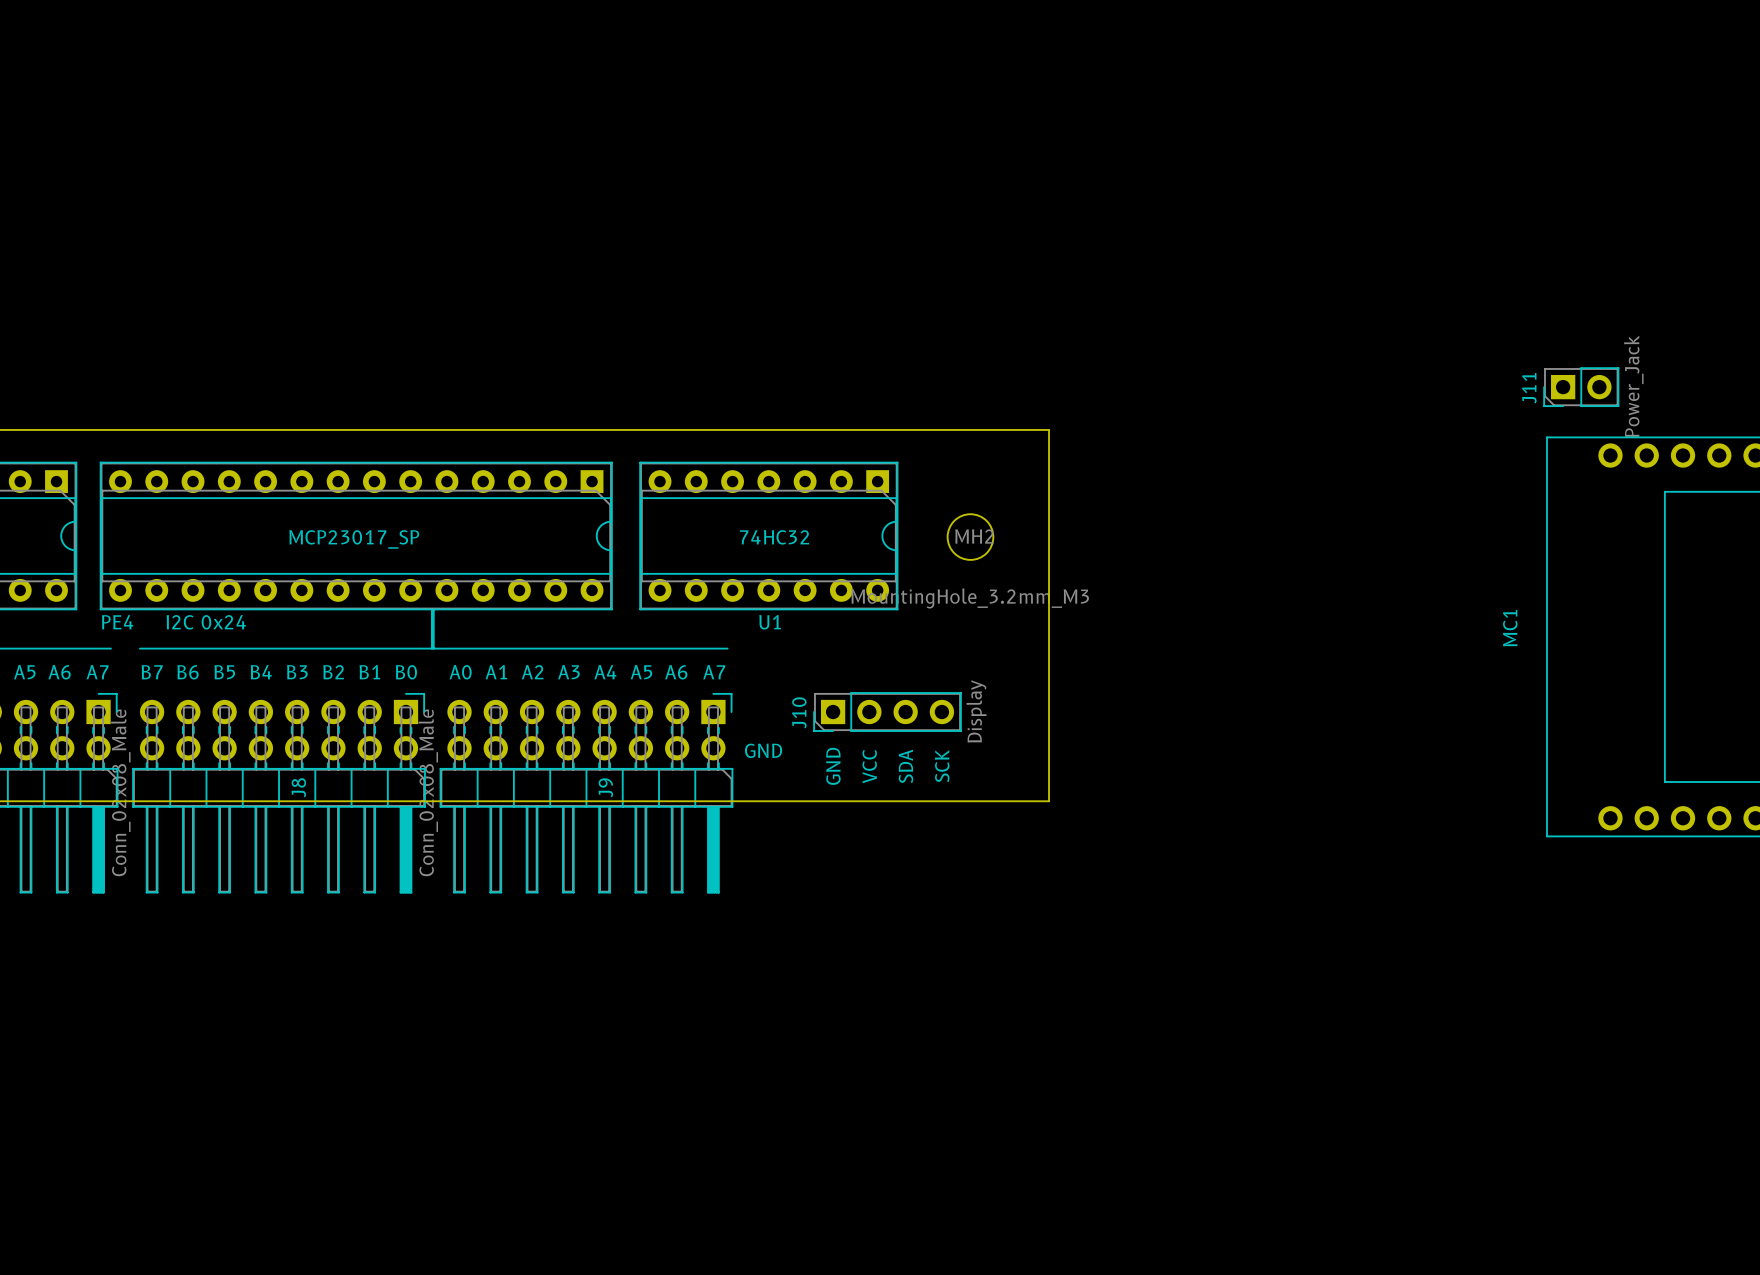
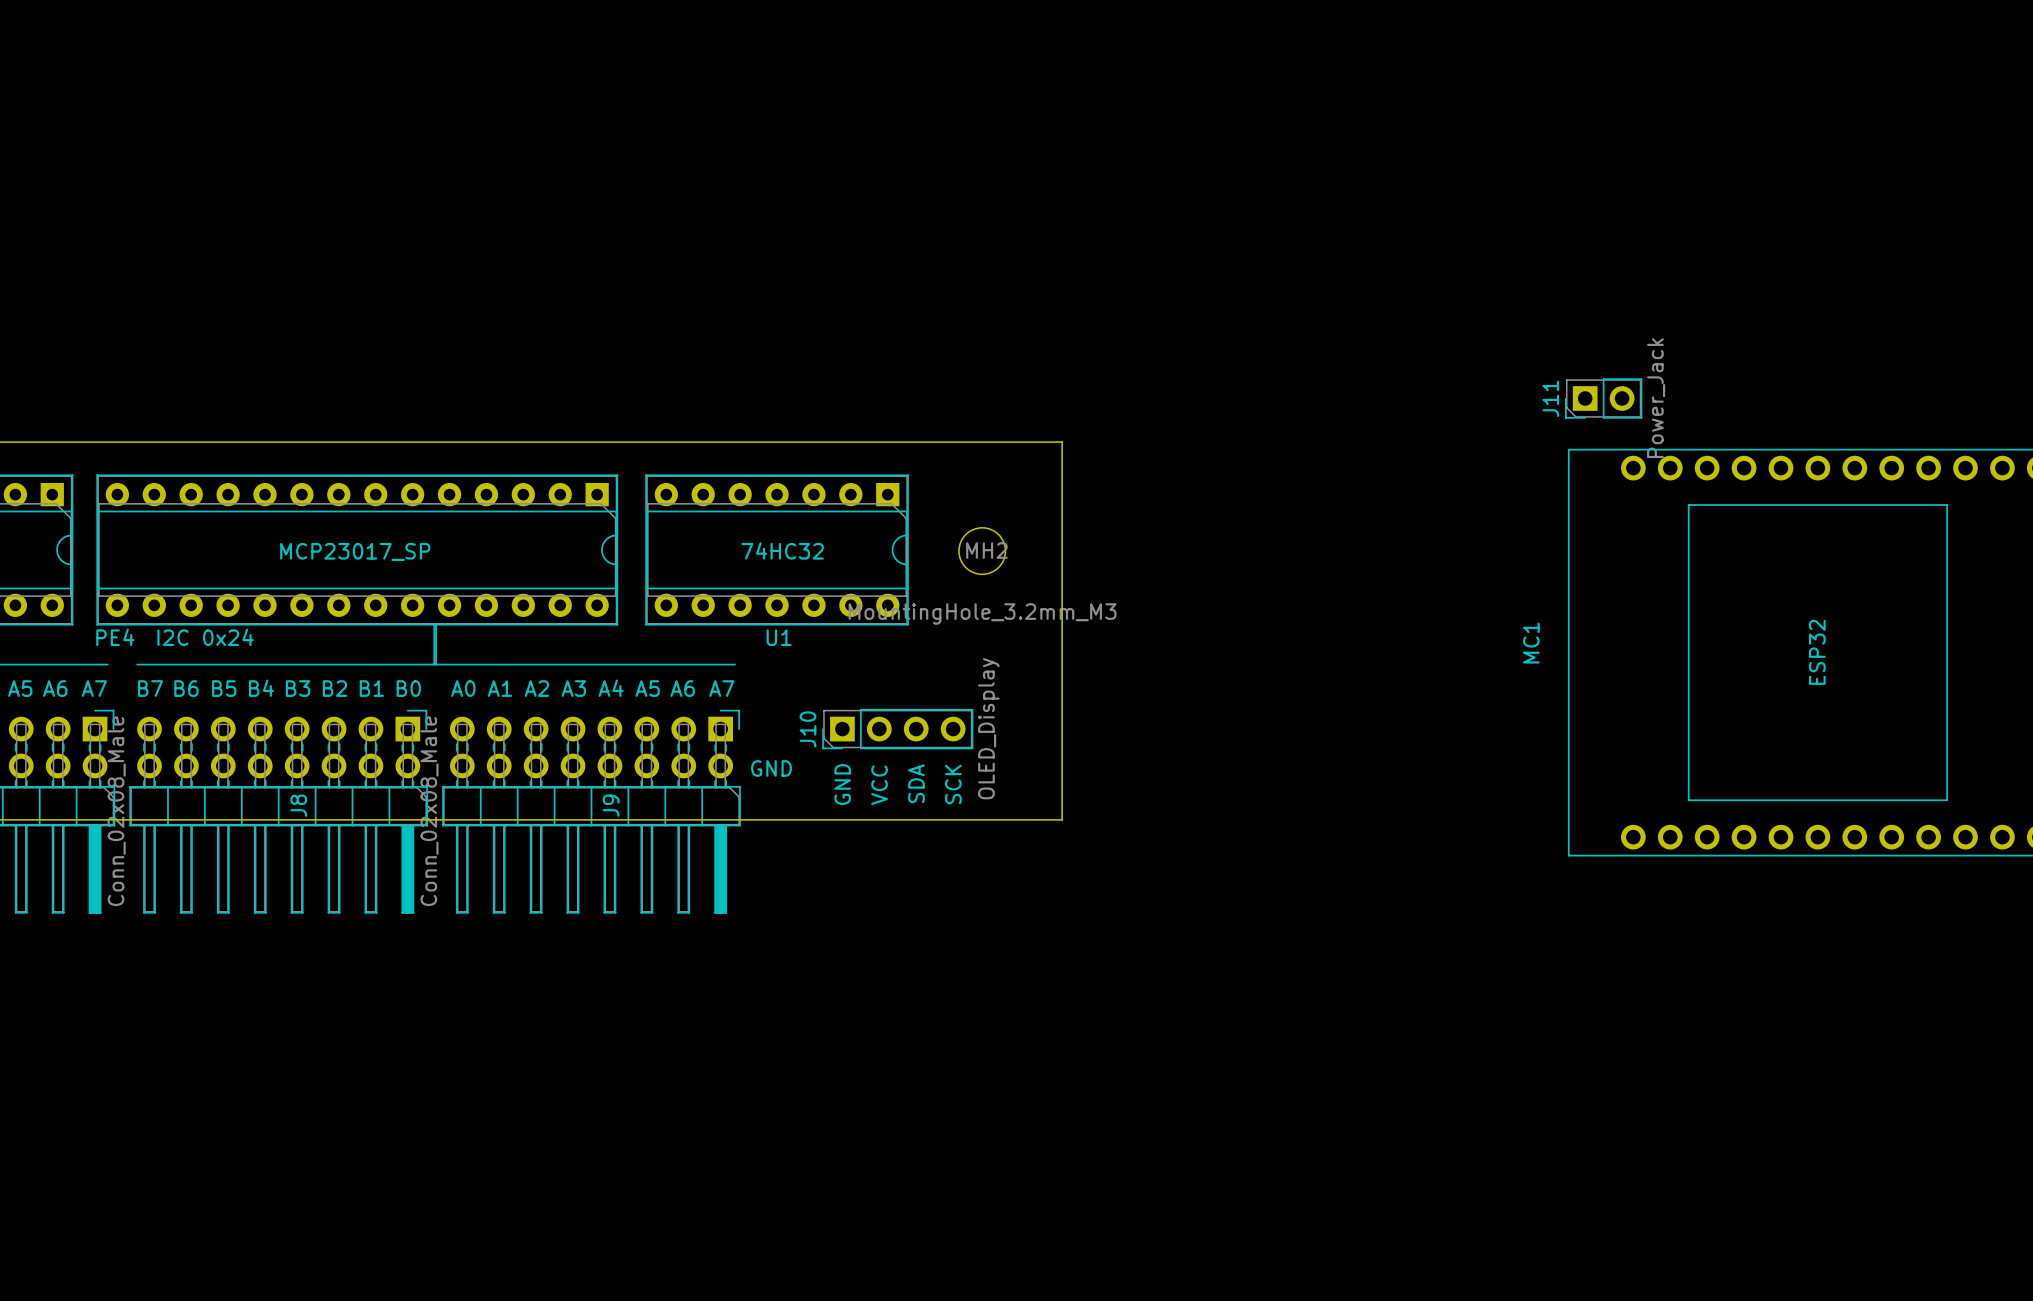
J10 value: Display (976, 711) -> OLED_Display (988, 728)

